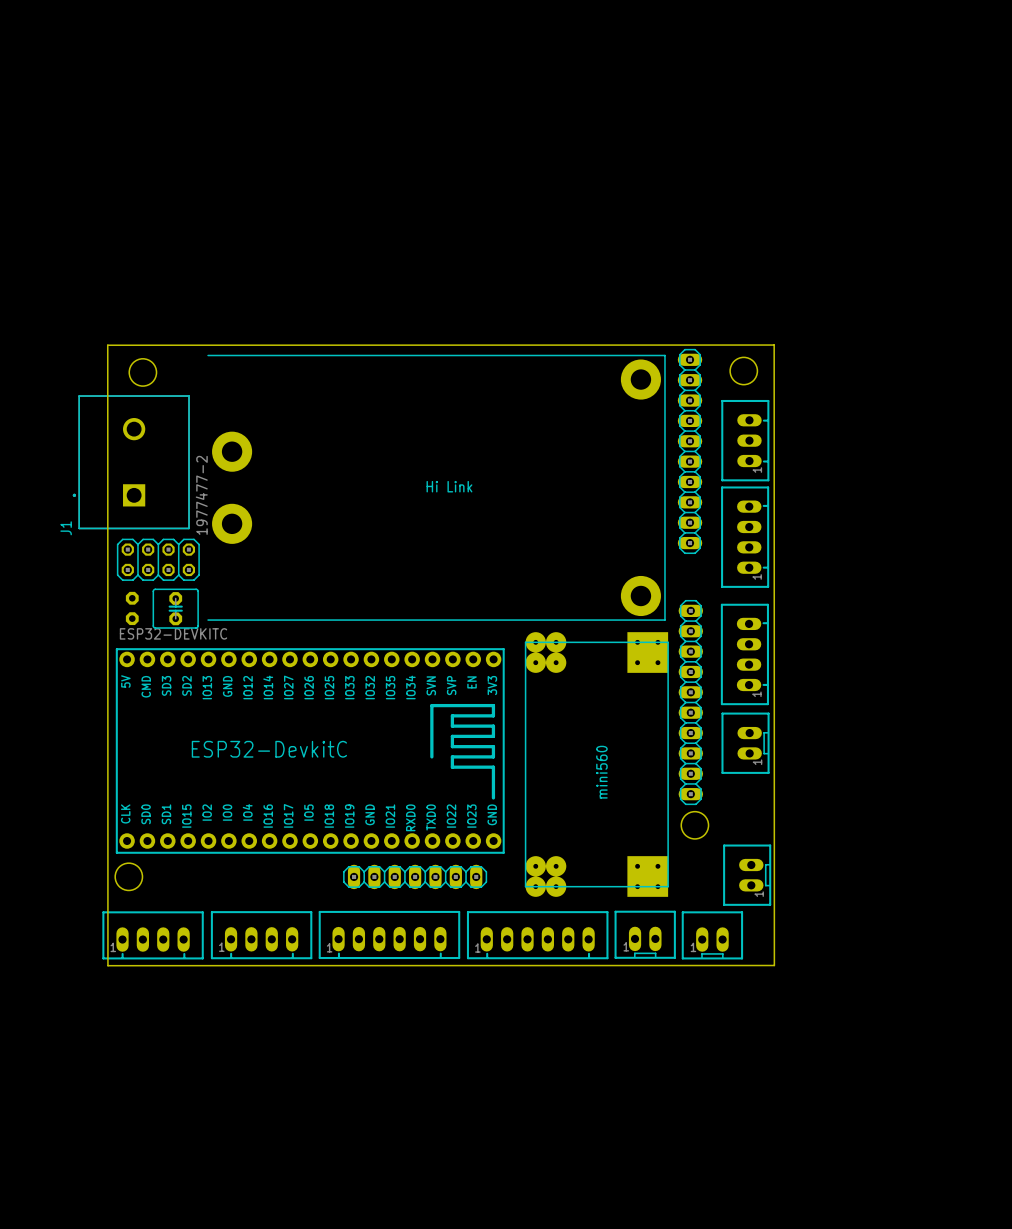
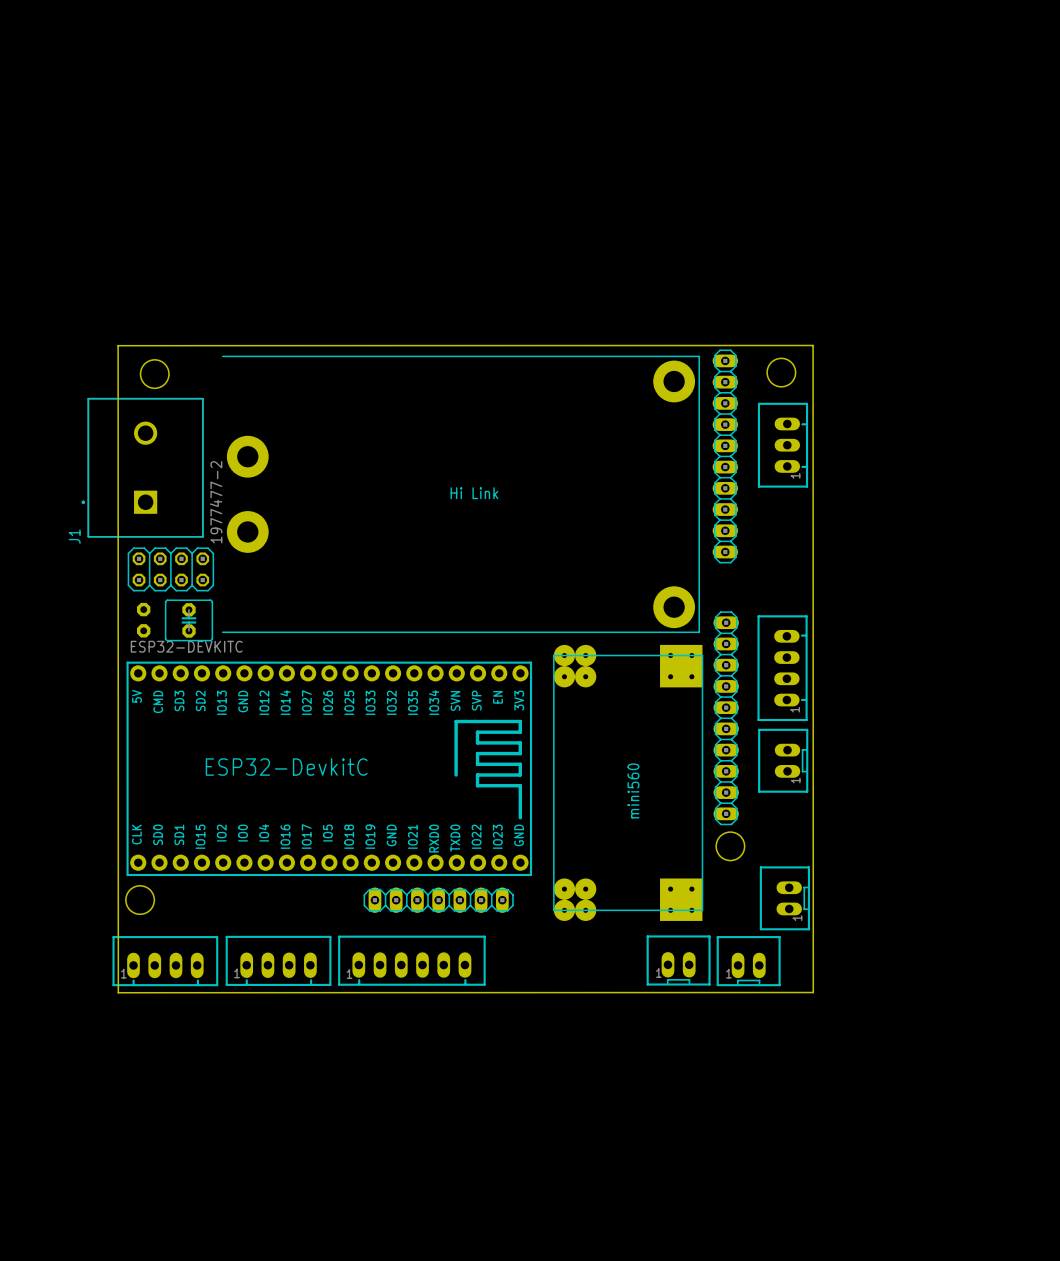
part: (745, 537) -> none
part: (537, 935) -> none

